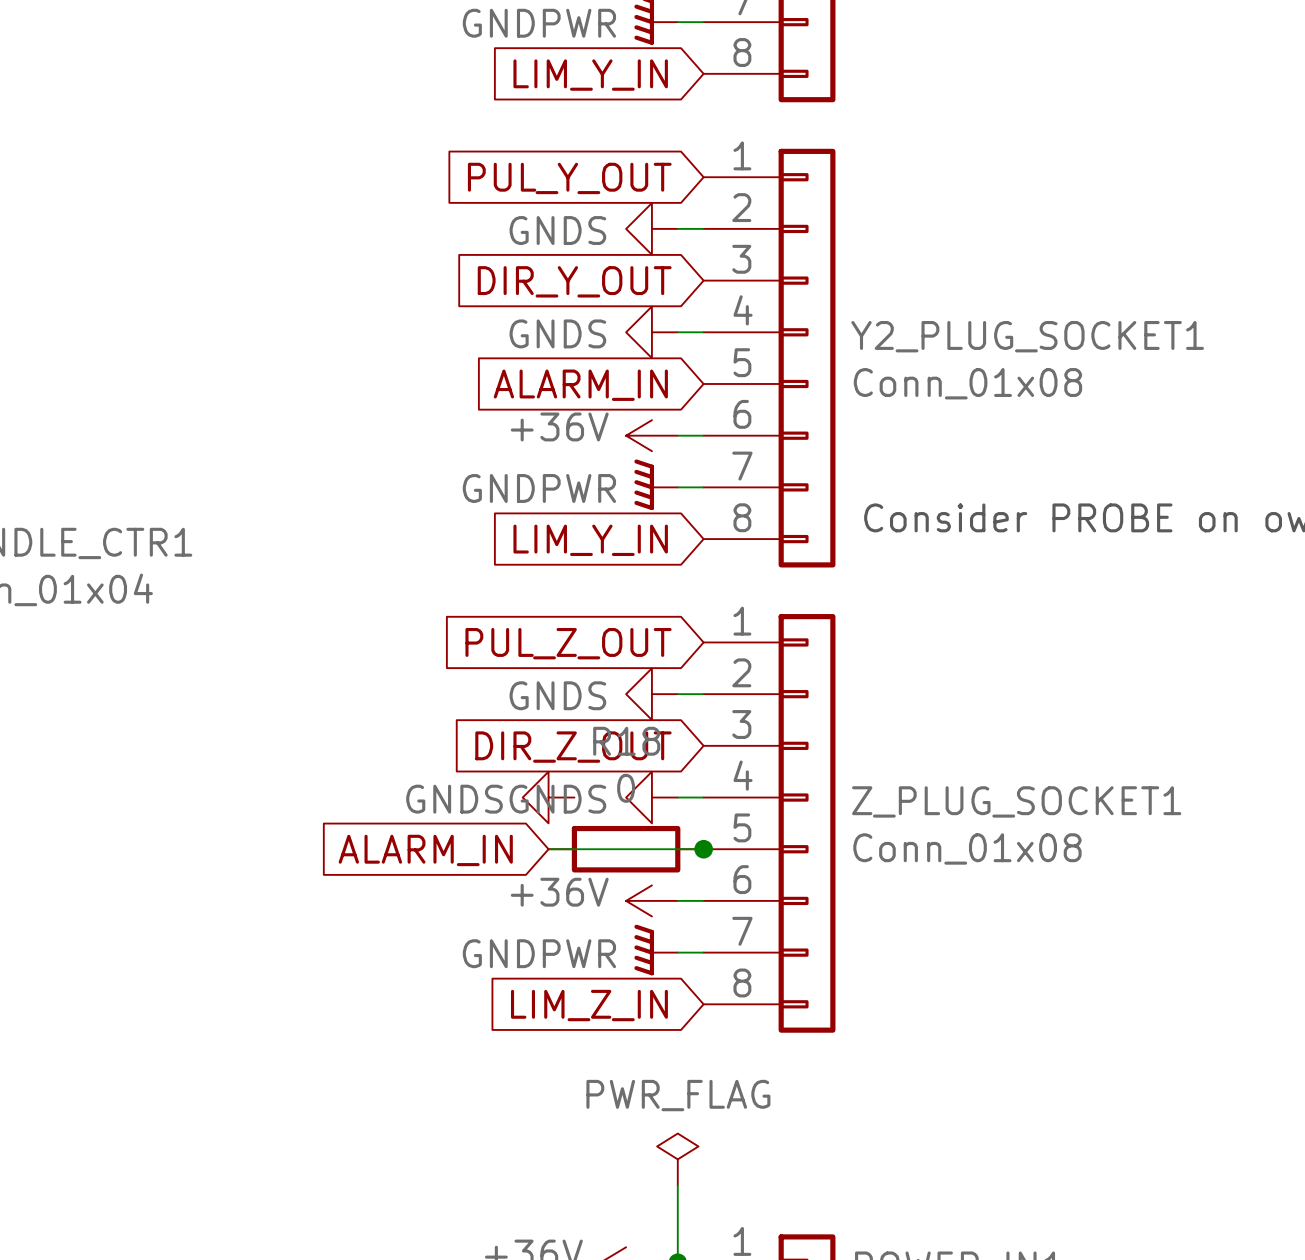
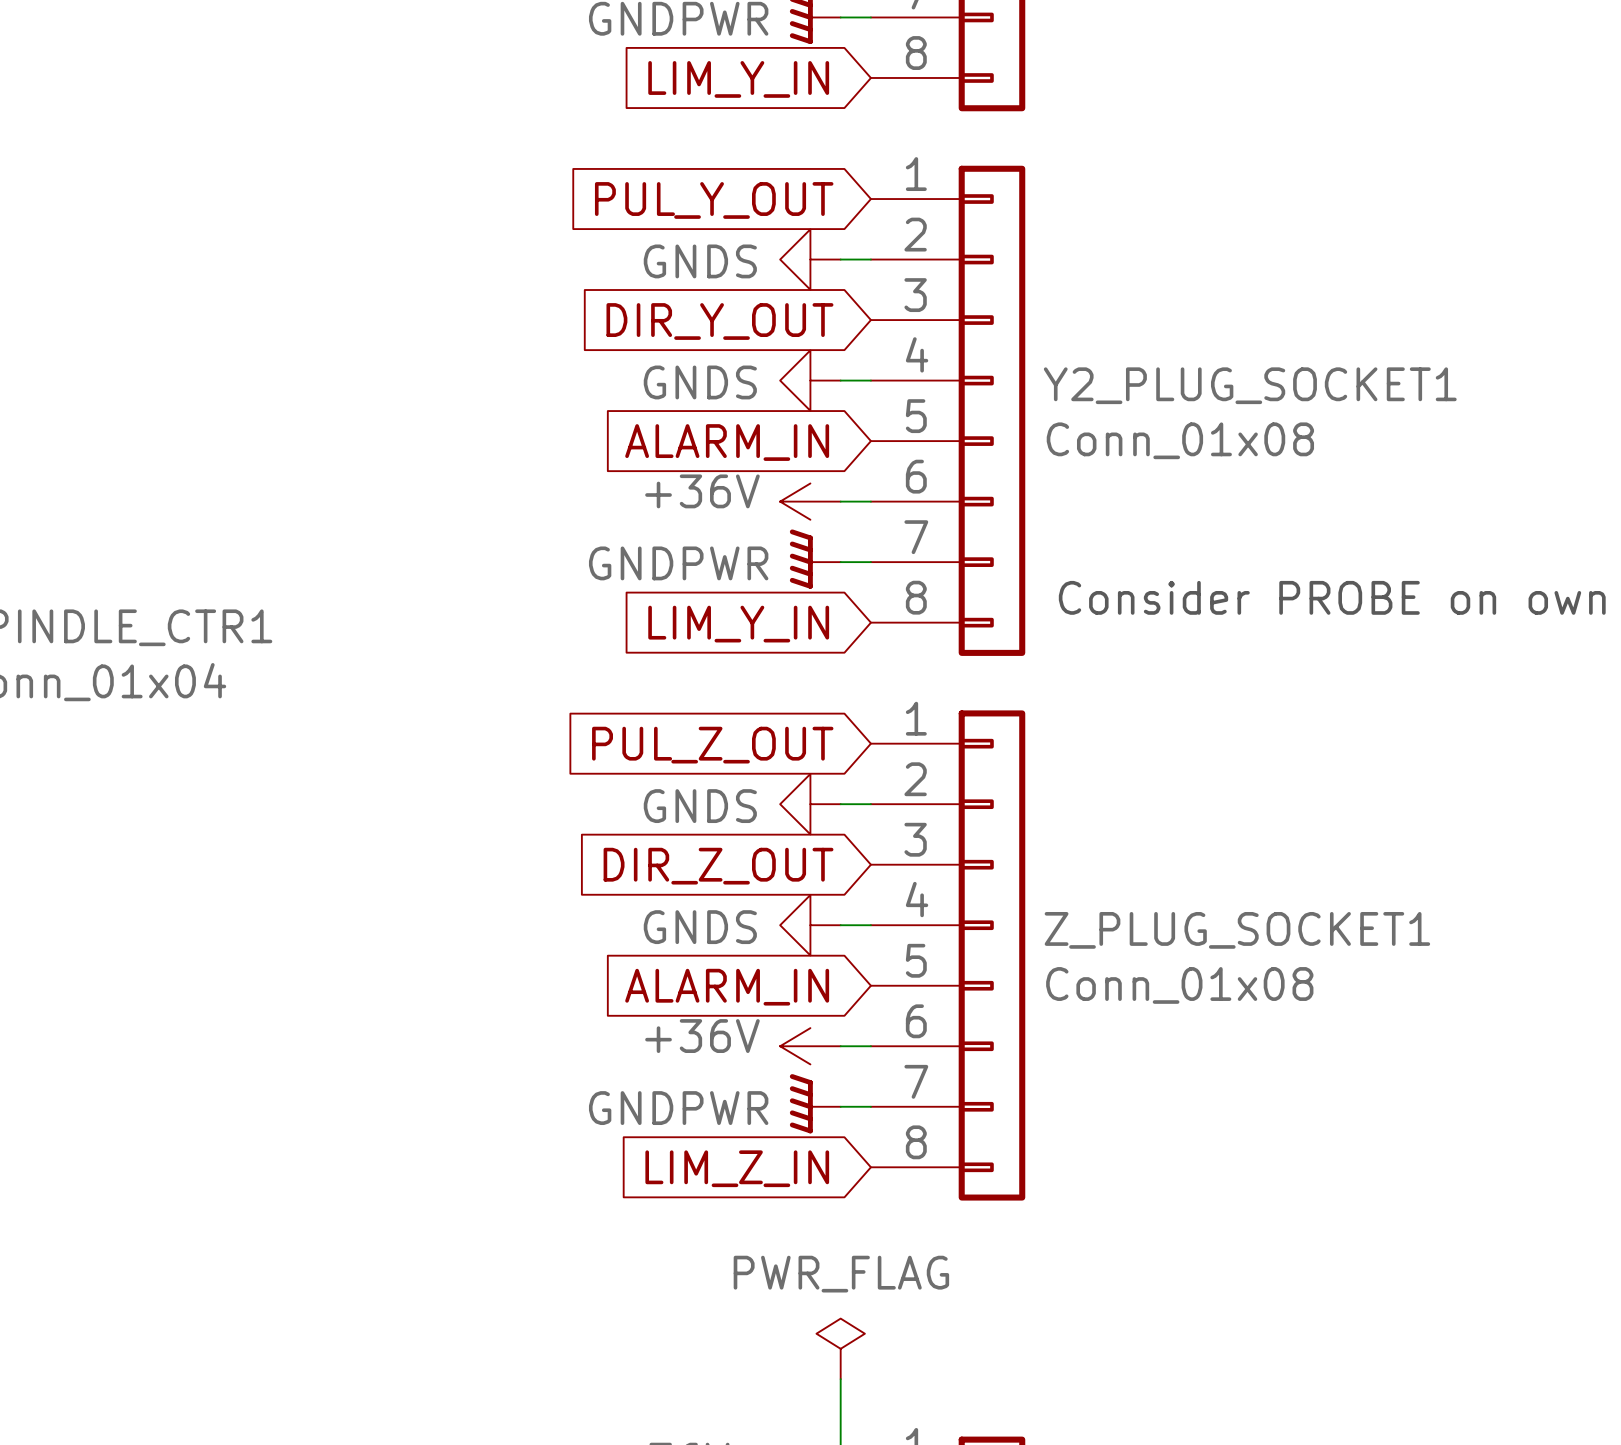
power symbol: GNDS (548, 797) -> none
wire: (548, 849) (703, 849) -> none
R18: 0 (626, 849) -> none
junction: (703, 849) -> none
global label position: ALARM_IN (425, 850) -> ALARM_IN (727, 987)

